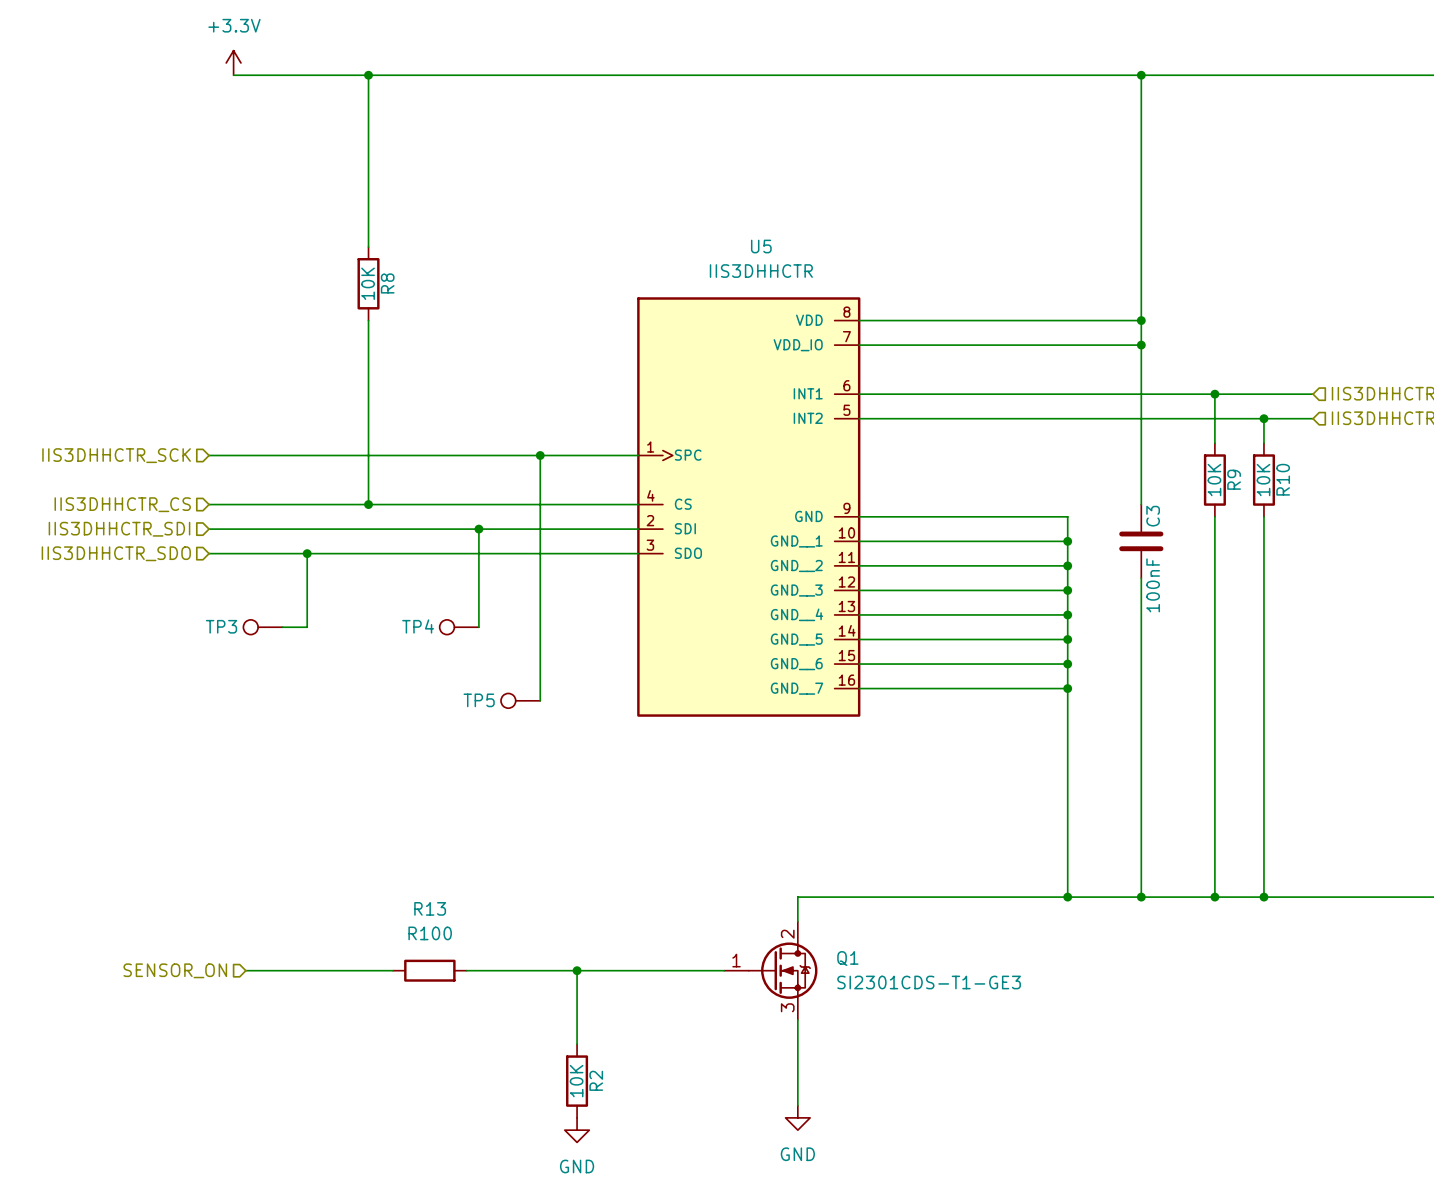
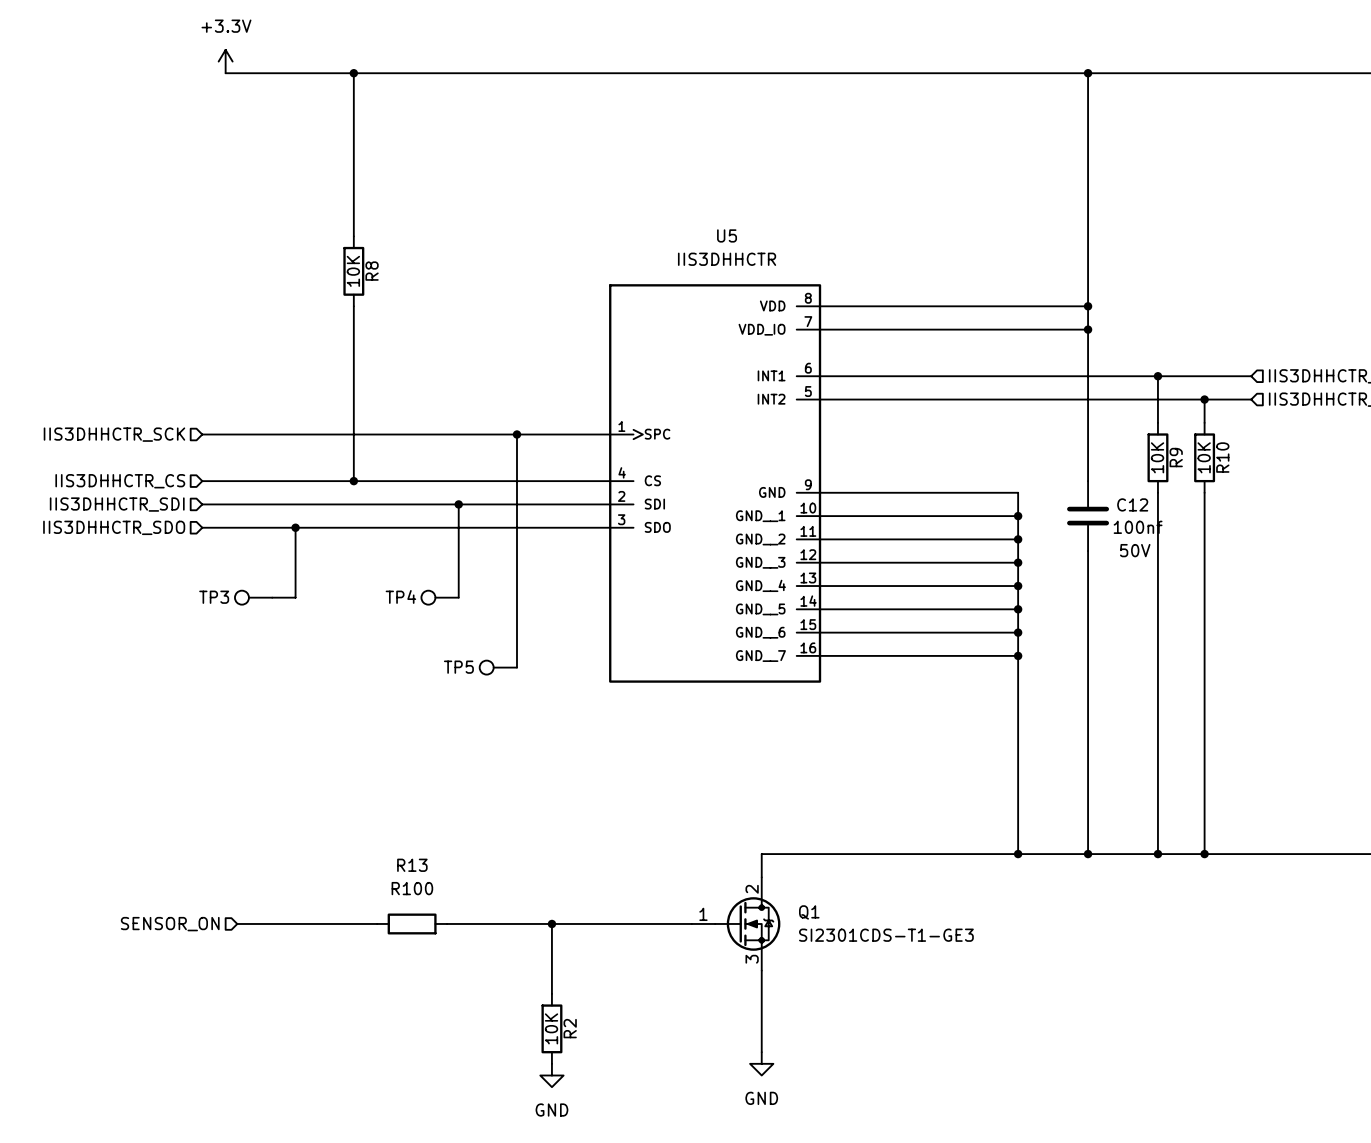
C3 name: C3 (1153, 516) -> C12 (1132, 504)
C3 text: none -> 50V (1135, 550)
C3 value: 100nF (1153, 585) -> 100nf (1138, 527)

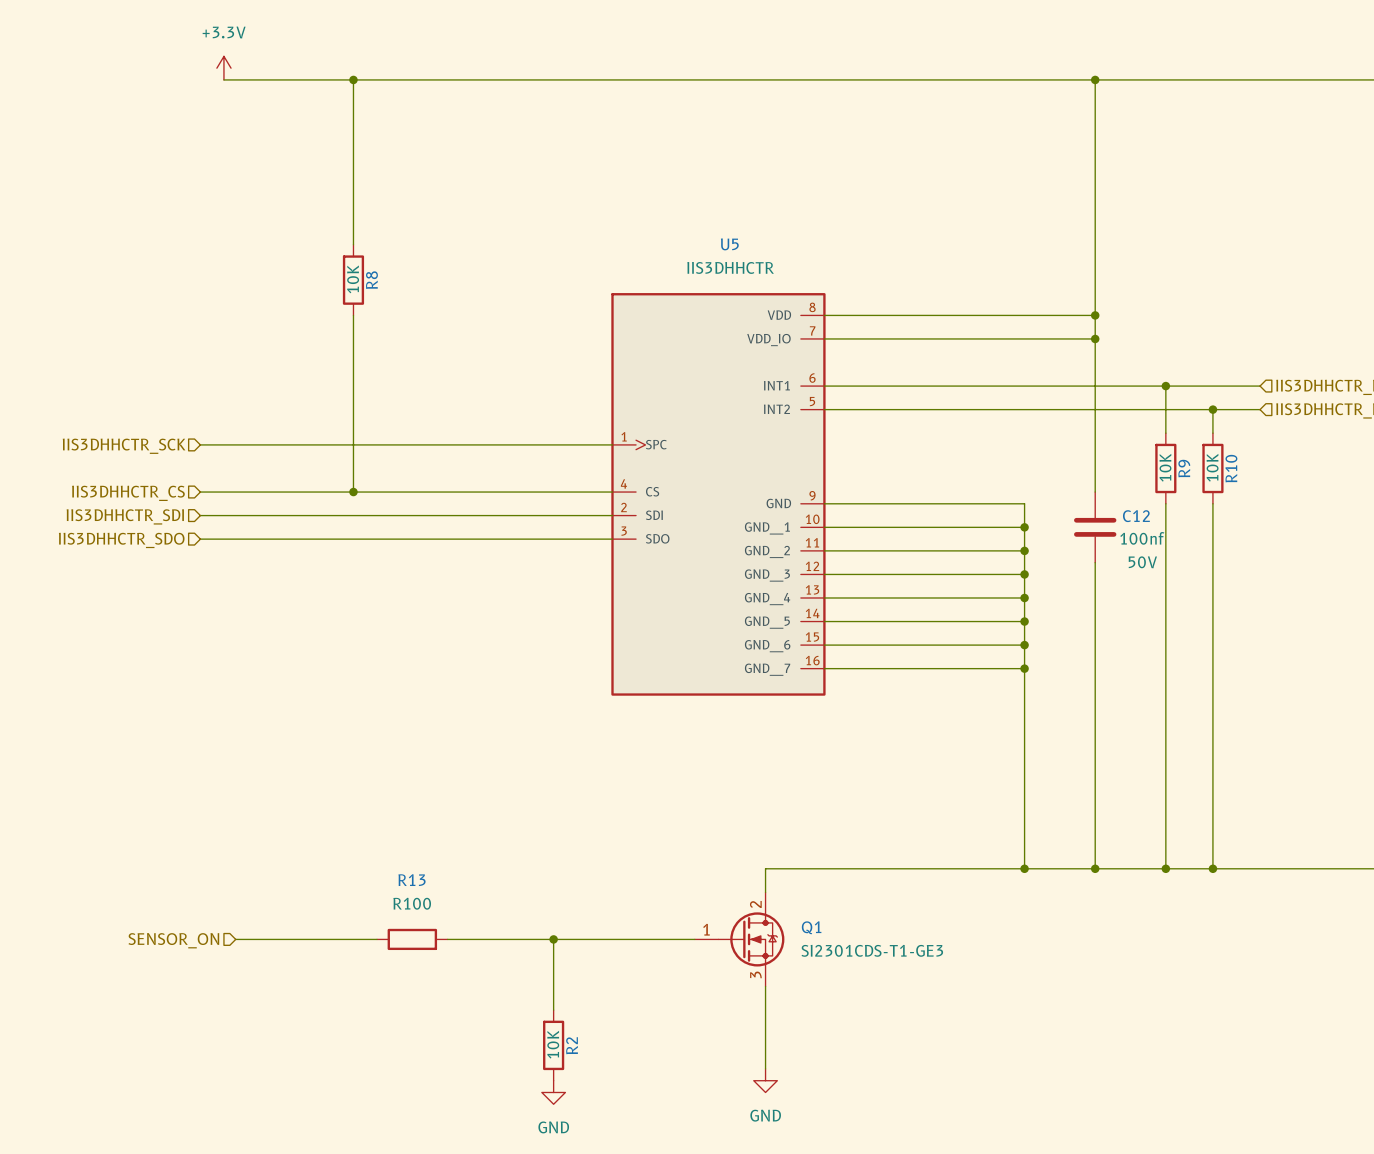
wire: (516, 434) (516, 667) -> none
junction: (516, 434) -> none
wire: (458, 504) (458, 597) -> none
junction: (458, 504) -> none
wire: (295, 527) (295, 597) (272, 597) -> none
junction: (295, 527) -> none
TP3: (253, 597) -> none
TP4: (440, 597) -> none
TP5: (498, 667) -> none

